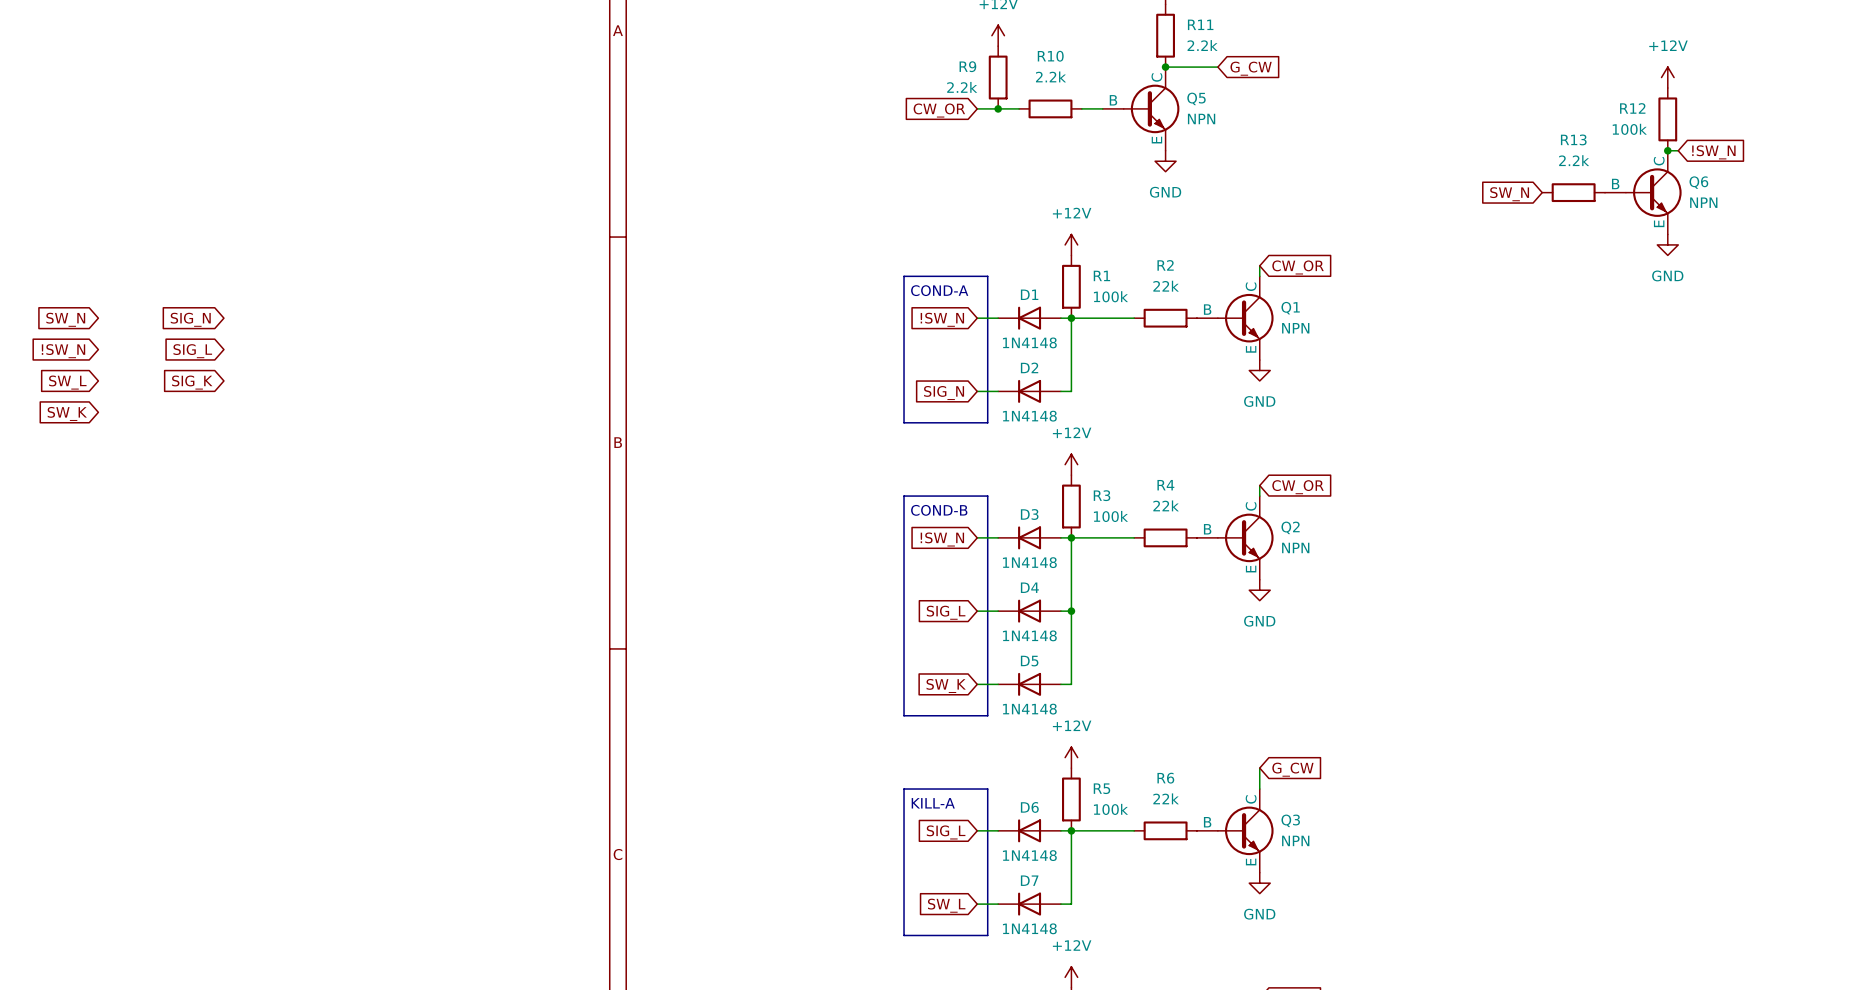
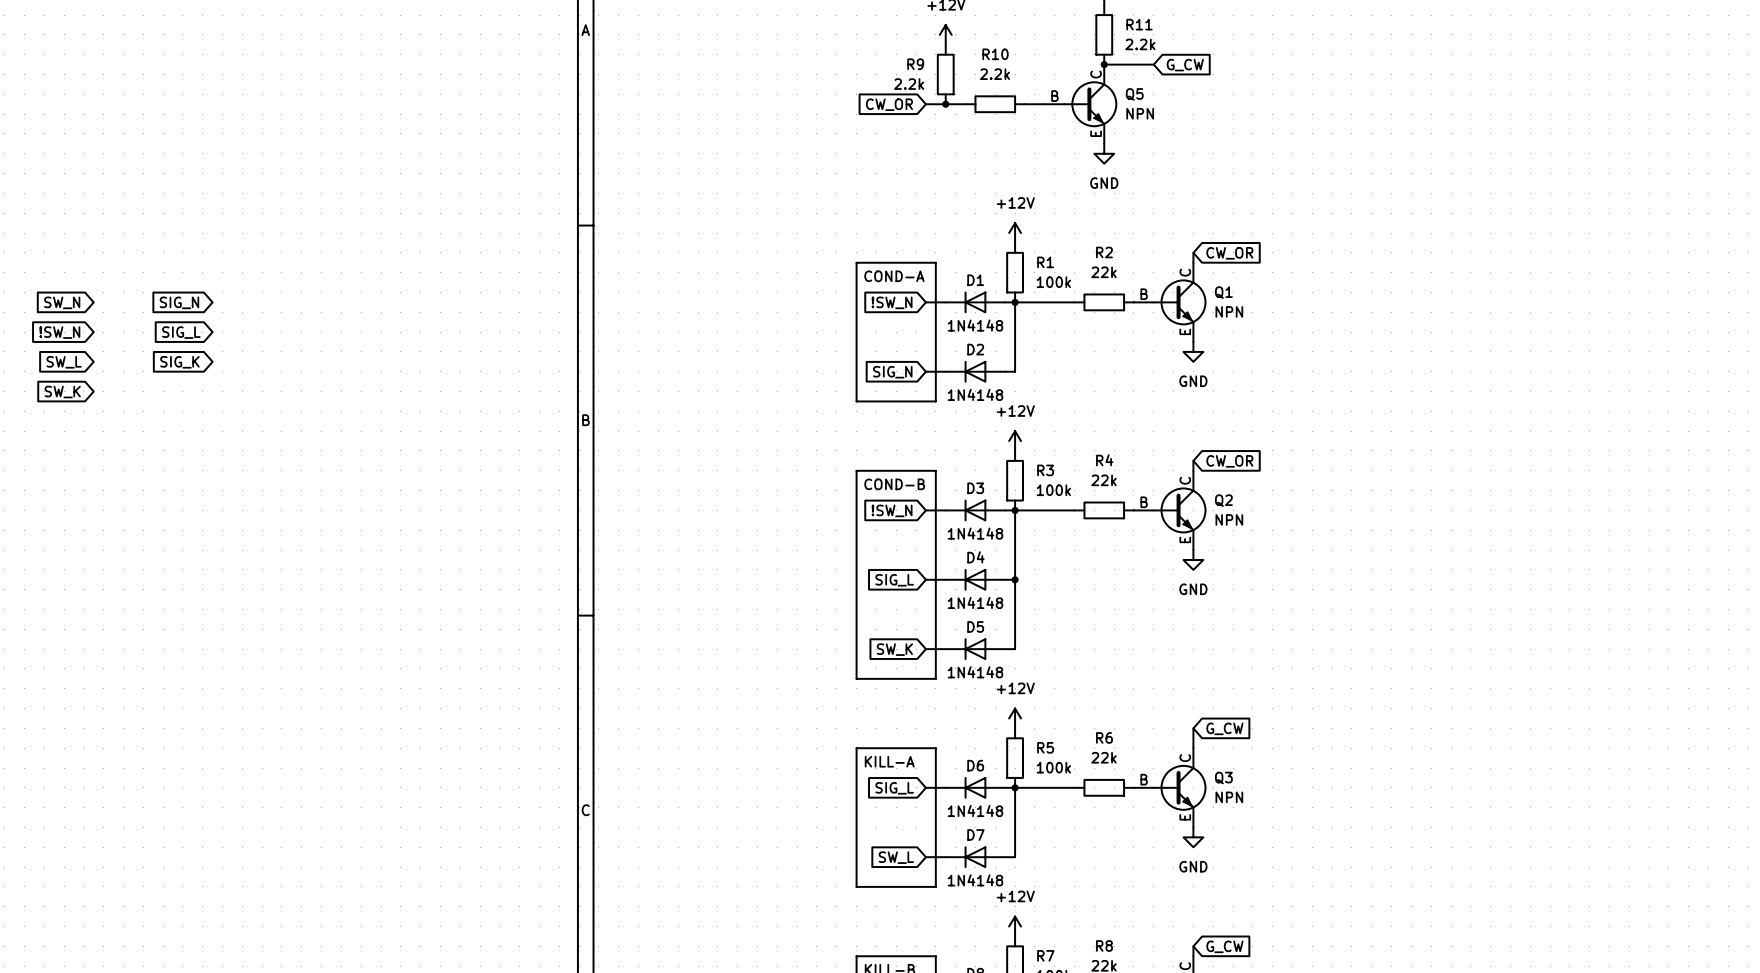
power symbol: +12V (1667, 77) -> none
R12: 100k (1667, 119) -> none
wire: (1667, 150) (1678, 150) -> none
junction: (1667, 150) -> none
global label: !SW_N (1713, 152) -> none
R13: 2.2k (1573, 192) -> none
Q6: NPN (1643, 192) -> none
global label: SW_N (1509, 194) -> none
power symbol: GND (1667, 244) -> none

